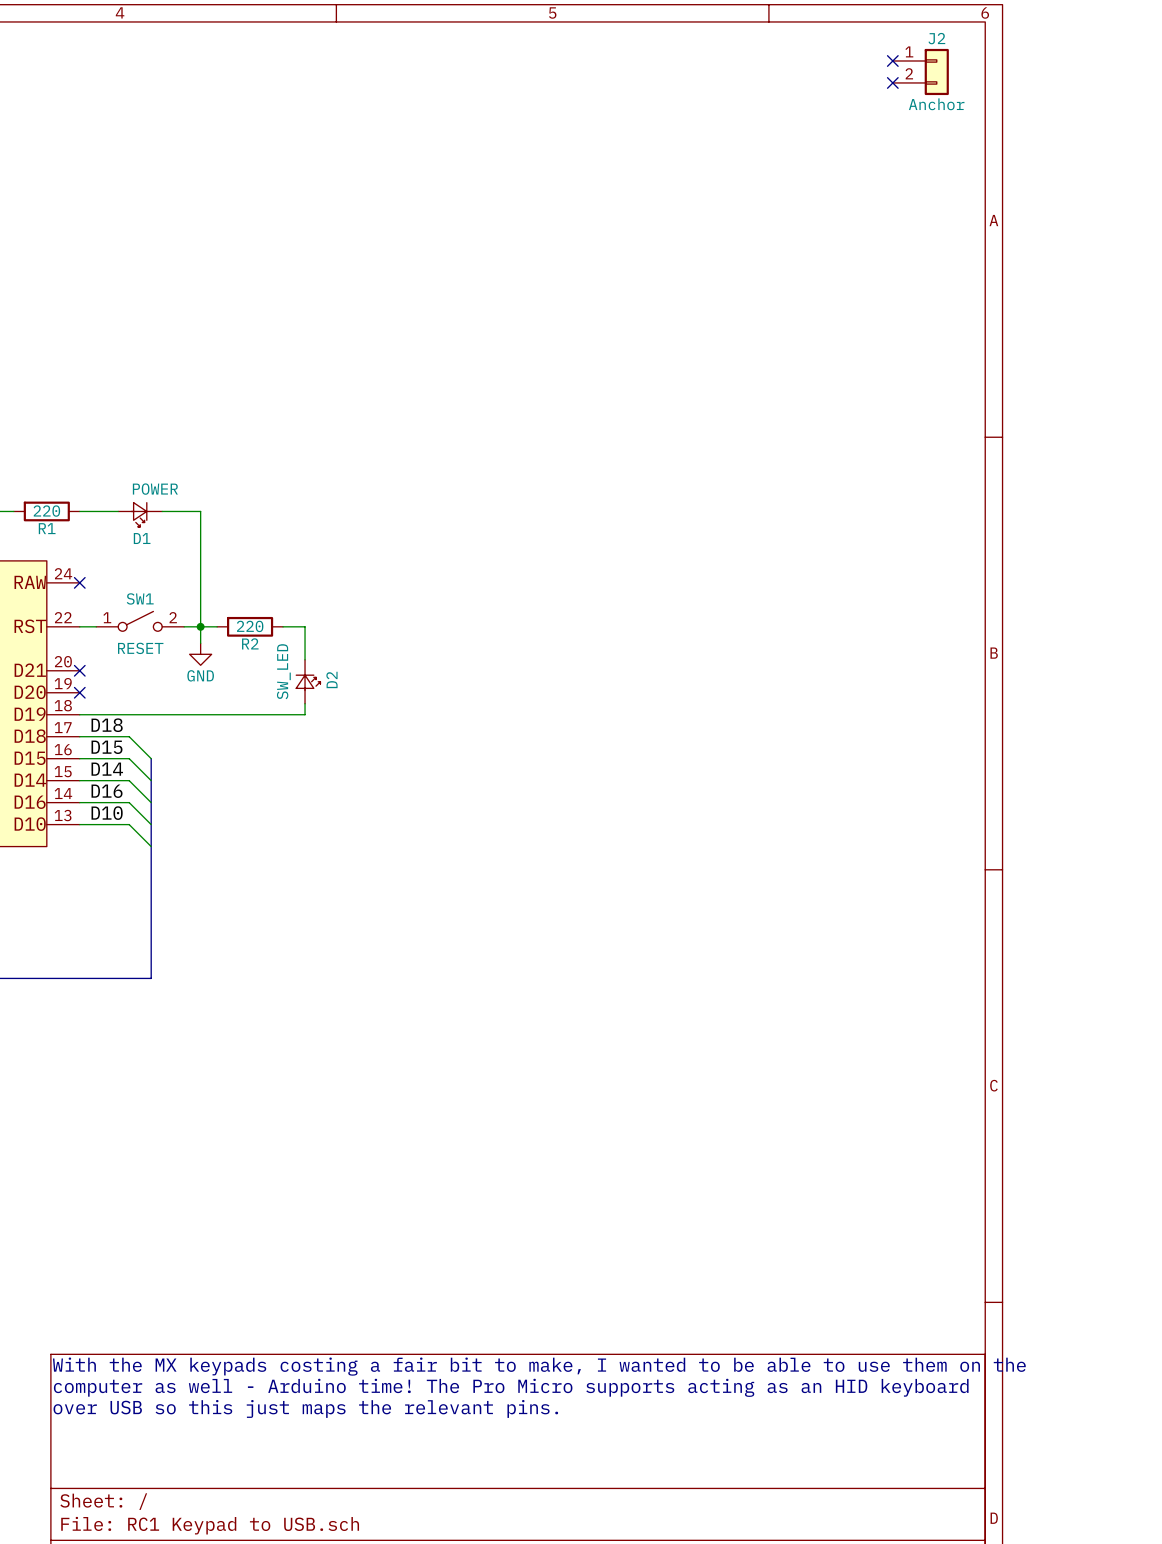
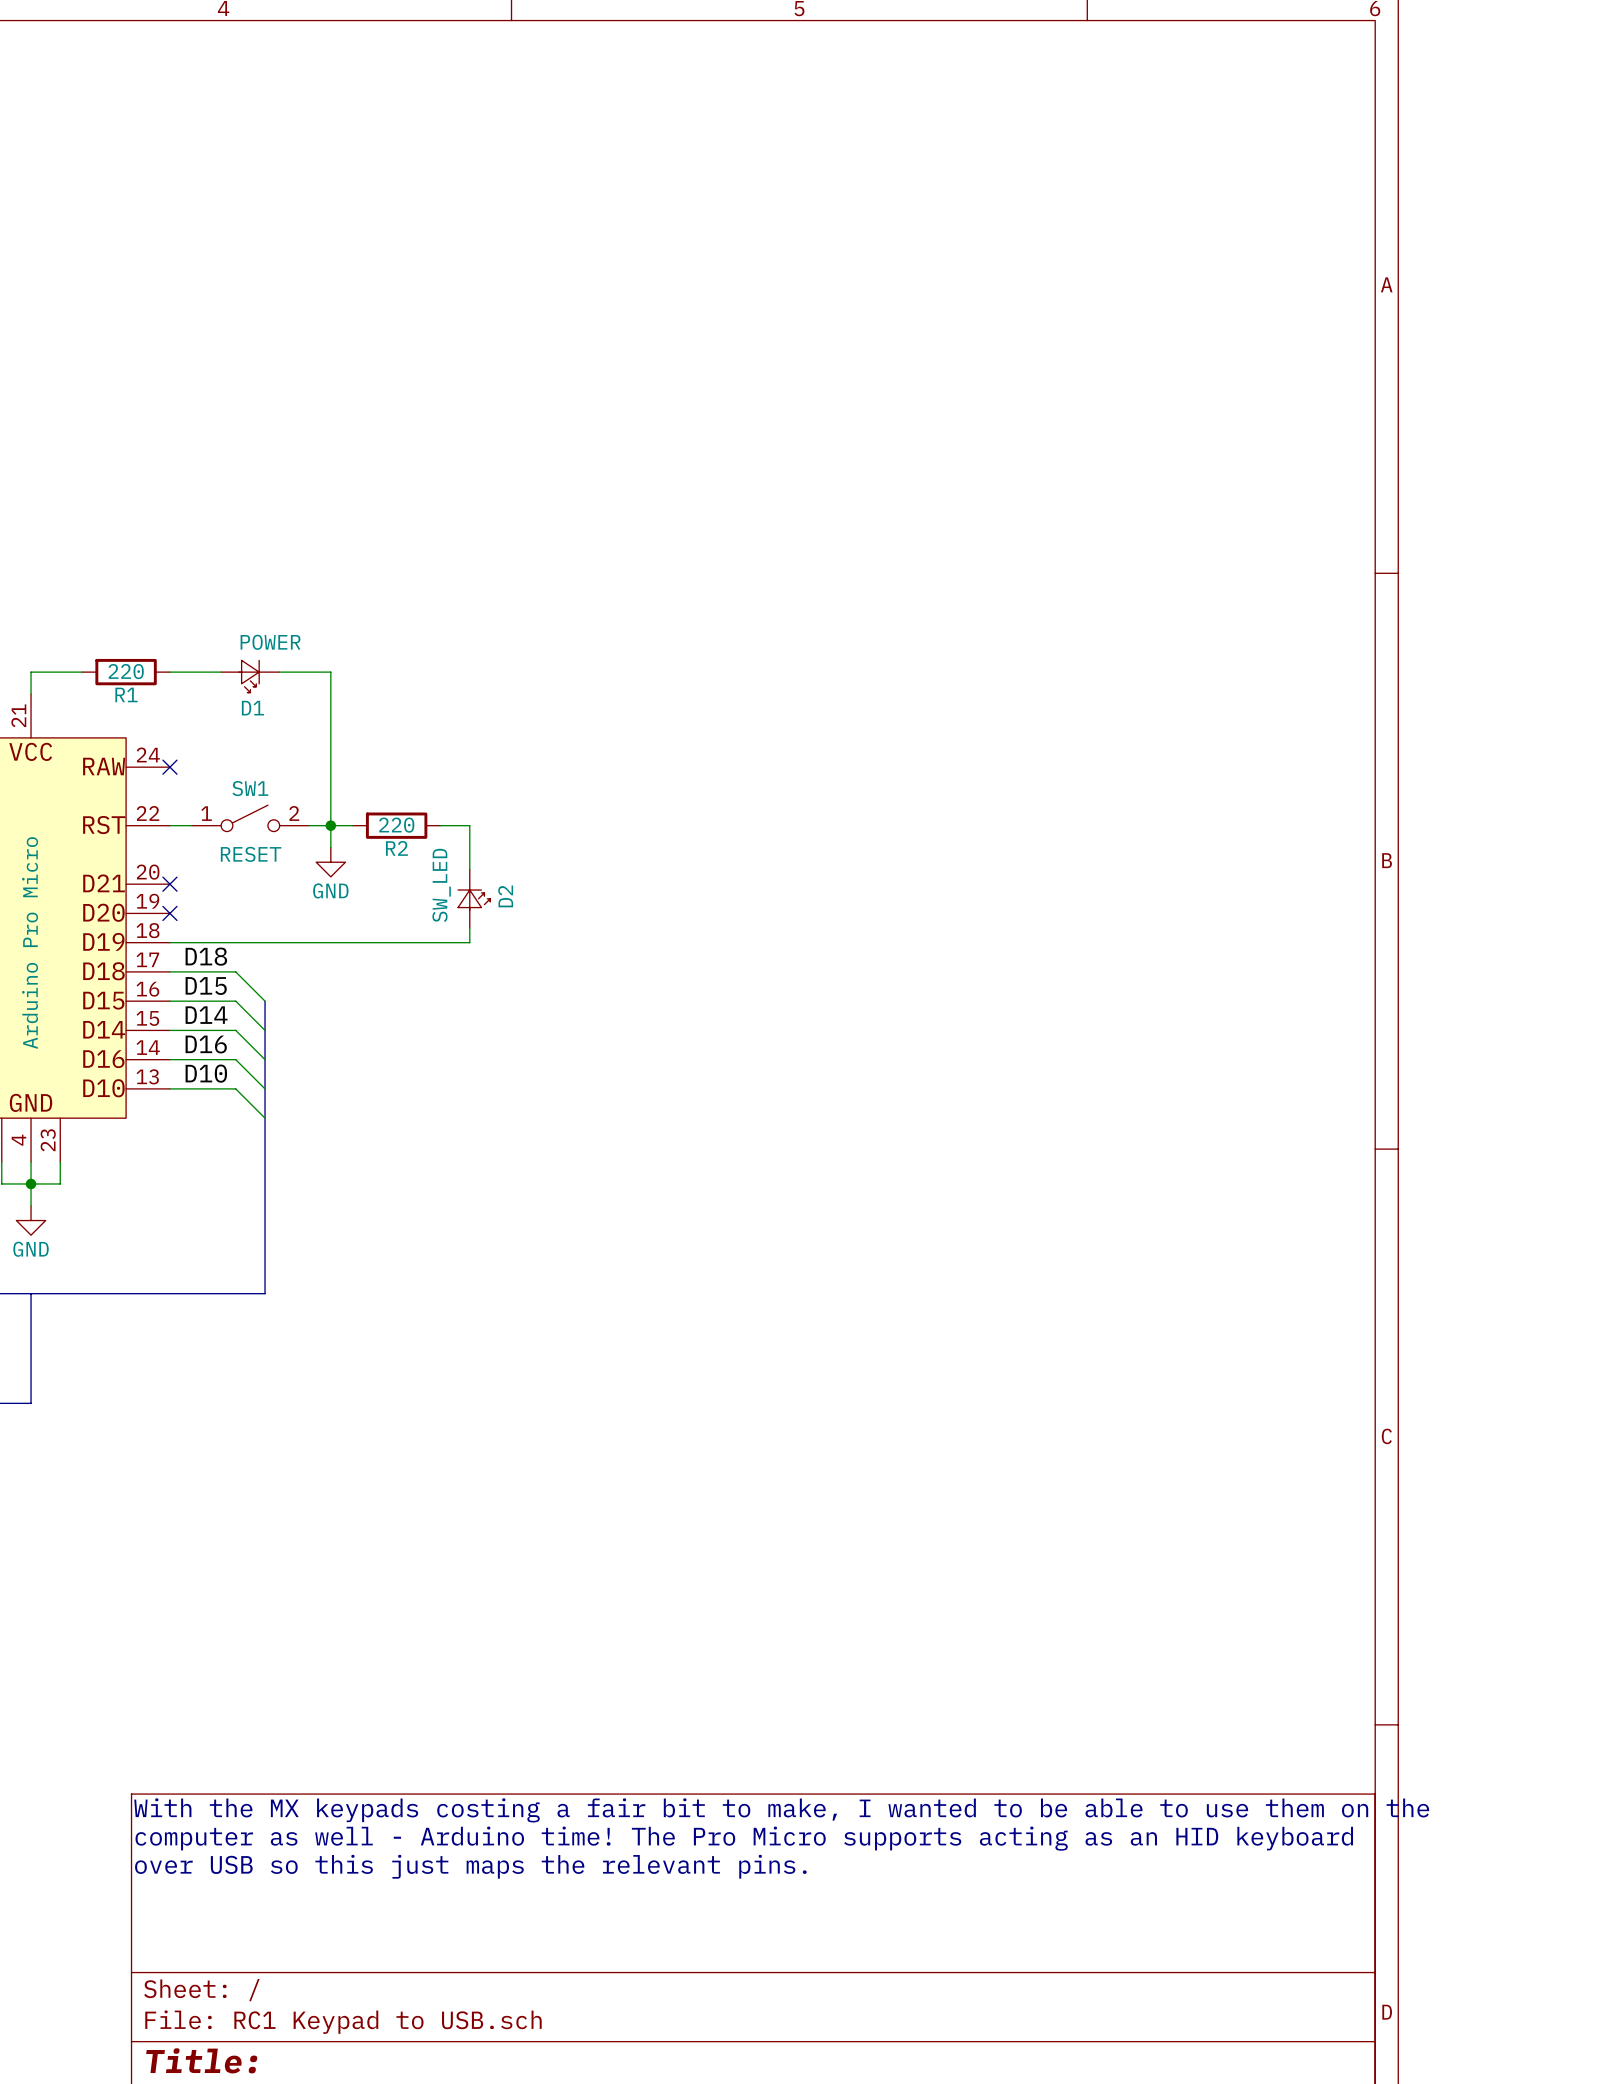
no-connect mark: (892, 60) -> none
J2: Anchor (920, 71) -> none
no-connect mark: (892, 82) -> none

